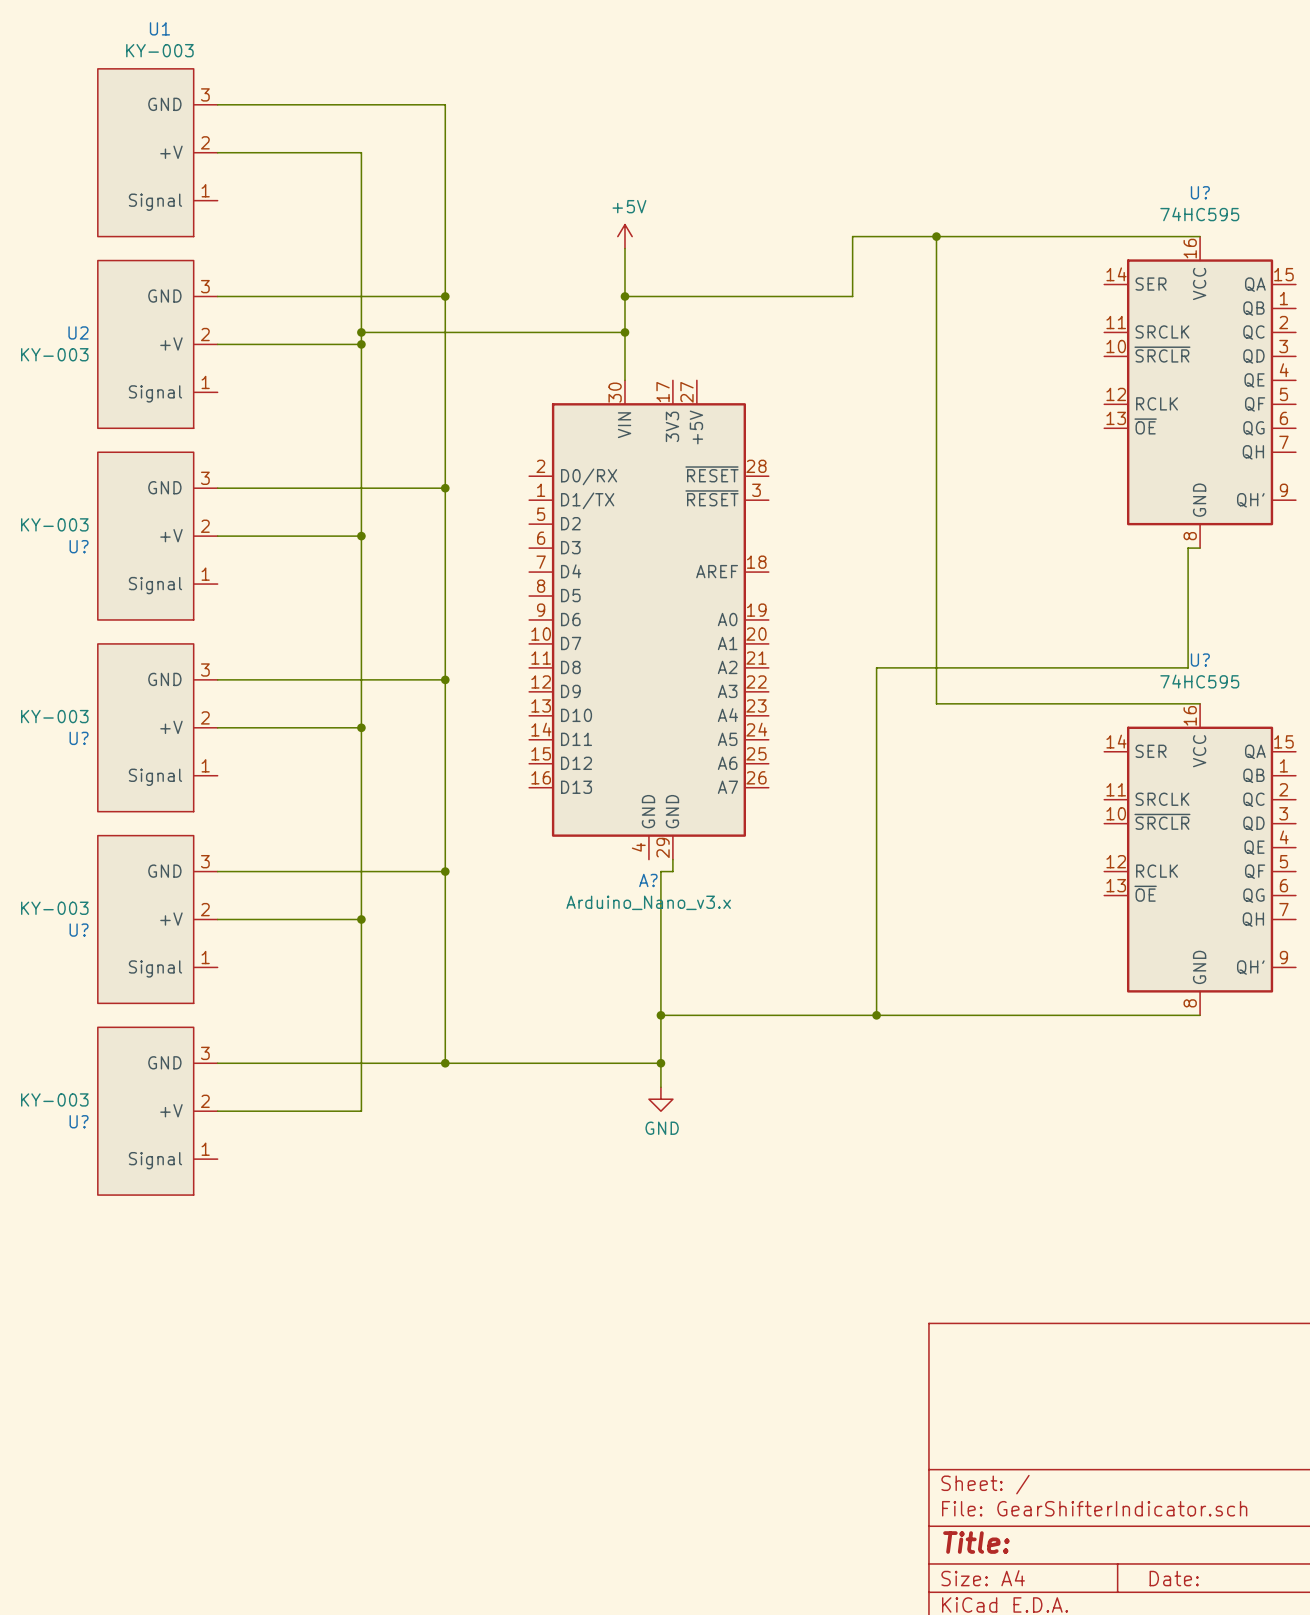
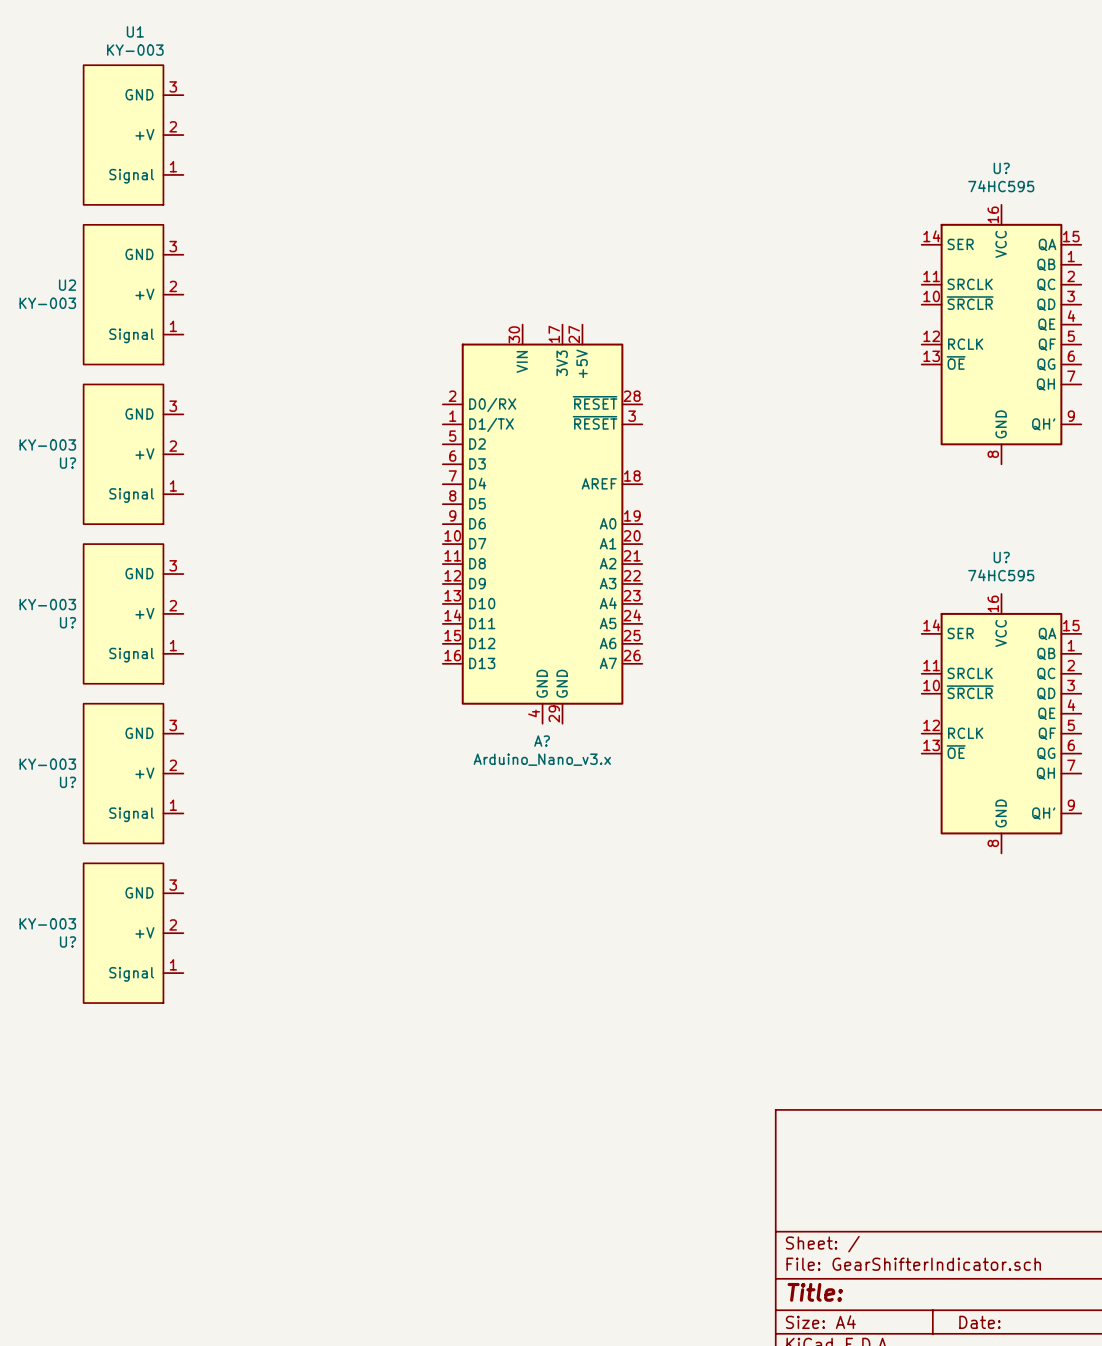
wire: (217, 104) (445, 104) (445, 1063) -> none
wire: (217, 152) (361, 152) (361, 1111) (217, 1111) -> none
power symbol: +5V (624, 236) -> none
wire: (936, 236) (936, 703) (1200, 703) -> none
junction: (936, 236) -> none
wire: (1200, 236) (852, 236) (852, 296) (624, 296) -> none
wire: (624, 248) (624, 380) -> none
wire: (217, 296) (445, 296) -> none
junction: (445, 296) -> none
junction: (624, 296) -> none
wire: (361, 332) (624, 332) -> none
junction: (361, 332) -> none
junction: (624, 332) -> none
wire: (217, 344) (361, 344) -> none
junction: (361, 344) -> none
wire: (217, 488) (445, 488) -> none
junction: (445, 488) -> none
wire: (217, 536) (361, 536) -> none
junction: (361, 536) -> none
wire: (1200, 548) (1188, 548) (1188, 667) (876, 667) (876, 1015) -> none
wire: (217, 679) (445, 679) -> none
junction: (445, 679) -> none
wire: (217, 727) (361, 727) -> none
junction: (361, 727) -> none
wire: (672, 859) (672, 871) (660, 871) (660, 1087) -> none
wire: (217, 871) (445, 871) -> none
junction: (445, 871) -> none
wire: (217, 919) (361, 919) -> none
junction: (361, 919) -> none
wire: (660, 1015) (1200, 1015) -> none
junction: (660, 1015) -> none
junction: (876, 1015) -> none
wire: (217, 1063) (660, 1063) -> none
junction: (445, 1063) -> none
junction: (660, 1063) -> none
power symbol: GND (660, 1099) -> none

